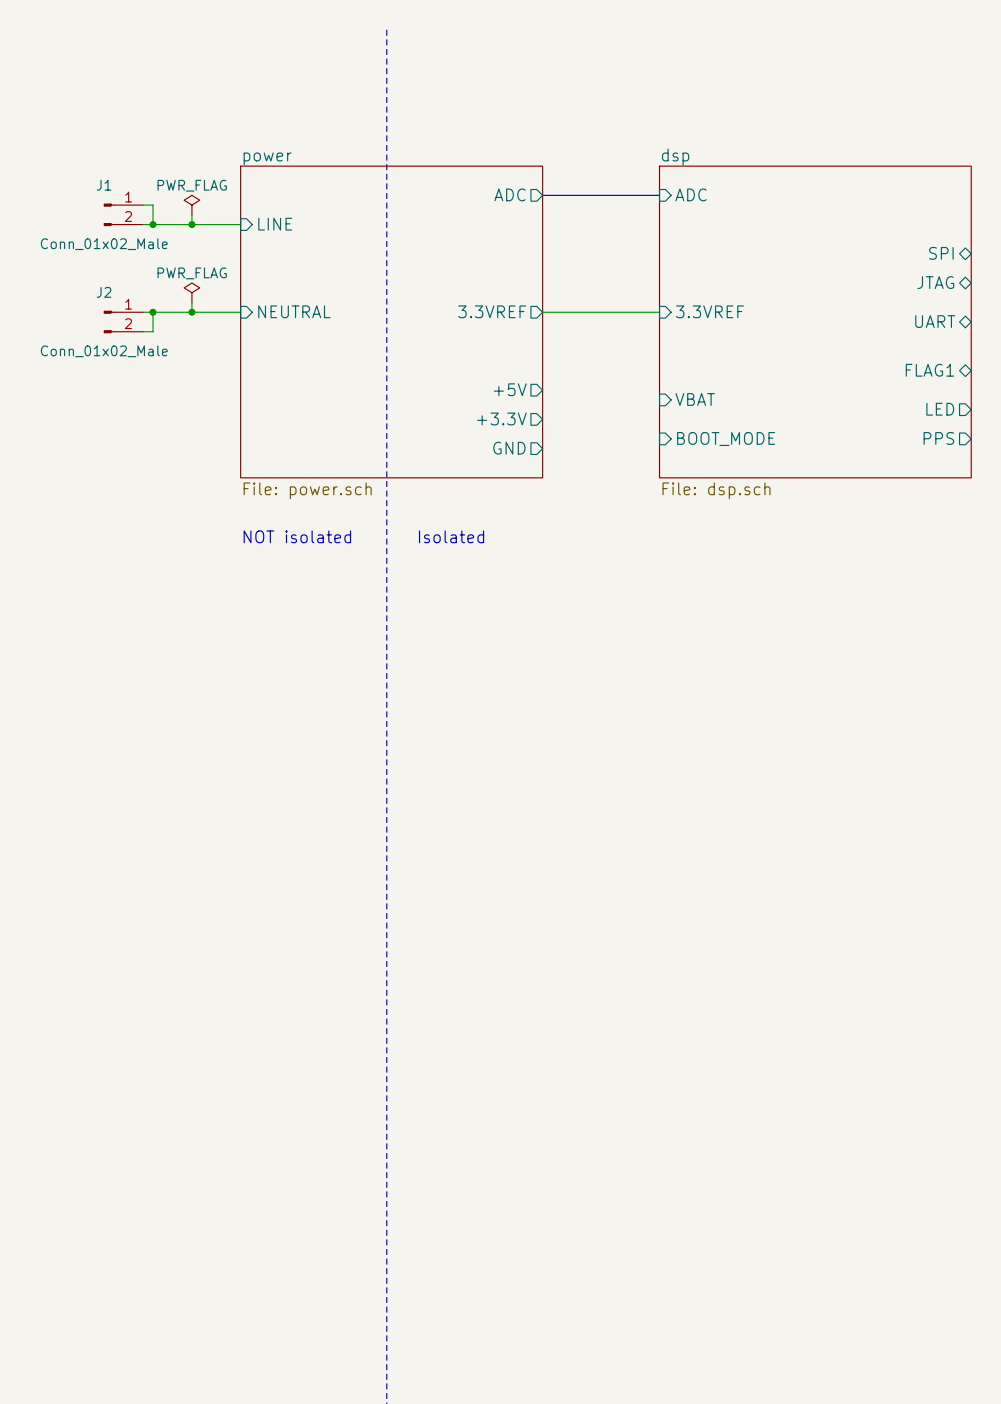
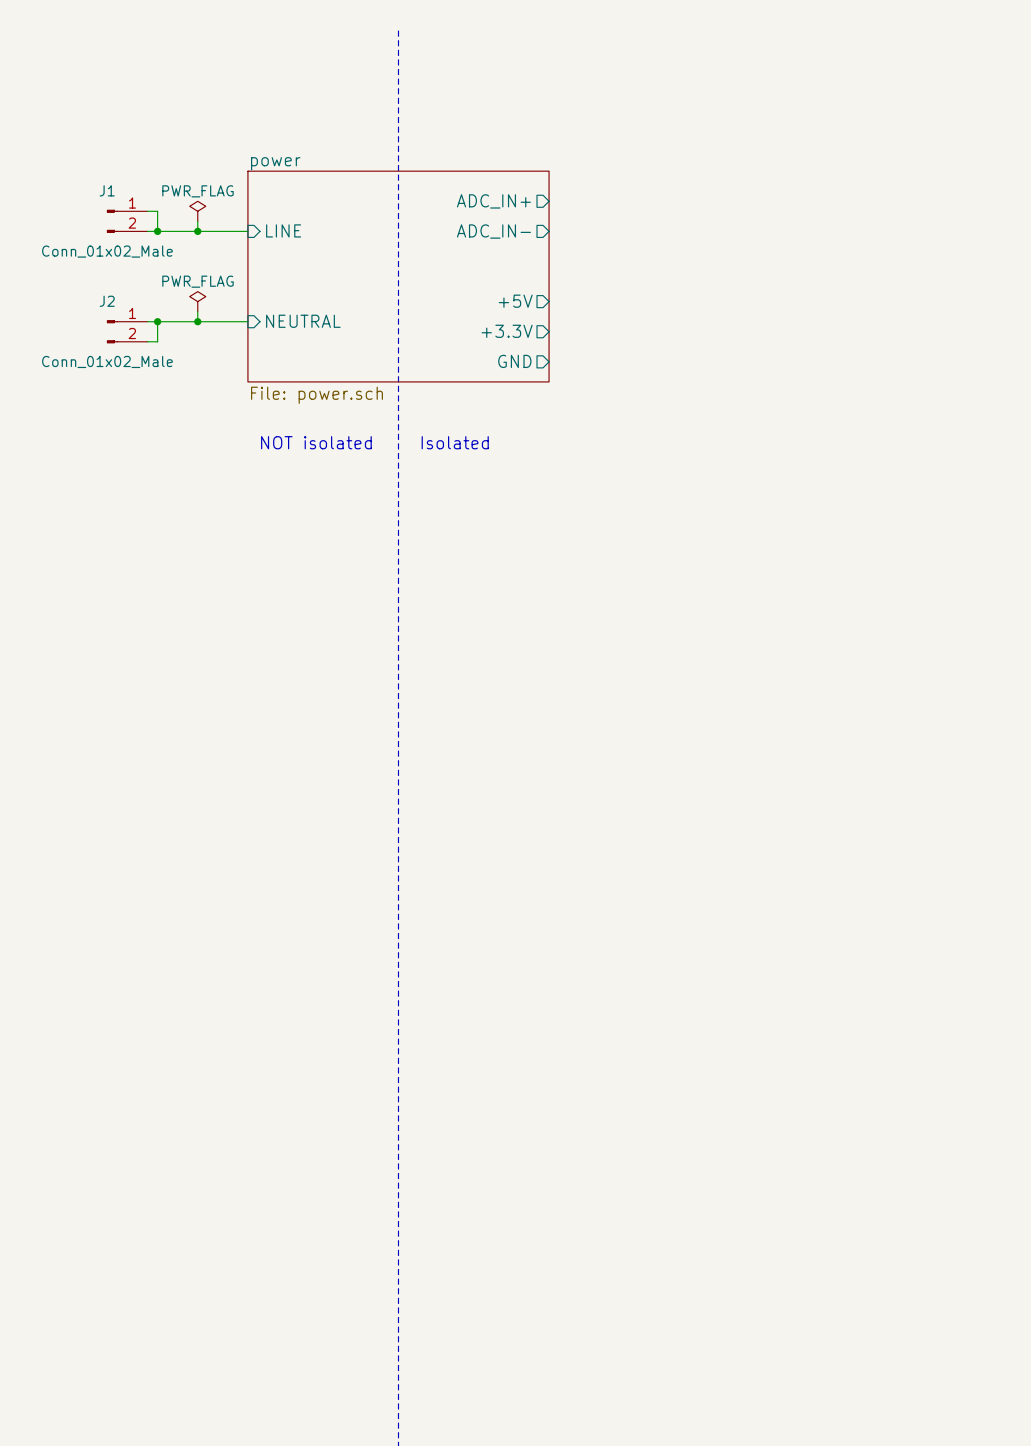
sheet pin: ADC (509, 194) -> none
sheet pin: ADC (691, 194) -> none
sheet pin: none -> ADC_IN+ (493, 201)
bus: (542, 195) (659, 195) -> none
sheet pin: none -> ADC_IN- (493, 231)
sheet pin: SPI (941, 253) -> none
sheet power: none -> File: power.sch (398, 276)
sheet pin: JTAG (935, 282) -> none
sheet pin: 3.3VREF (492, 311) -> none
sheet pin: 3.3VREF (709, 311) -> none
wire: (542, 312) (659, 312) -> none
sheet power: File: power.sch (391, 321) -> none
sheet dsp: File: dsp.sch (815, 321) -> none
sheet pin: UART (935, 321) -> none
sheet pin: FLAG1 (929, 370) -> none
sheet pin position: +5V (510, 389) -> +5V (515, 301)
sheet pin: VBAT (695, 399) -> none
sheet pin: LED (940, 409) -> none
sheet pin position: +3.3V (501, 418) -> +3.3V (507, 331)
sheet pin: PPS (938, 438) -> none
sheet pin: BOOT_MODE (726, 439) -> none
sheet pin position: GND (509, 448) -> GND (514, 361)
text position: NOT isolated (297, 536) -> NOT isolated (316, 442)
text position: Isolated (451, 536) -> Isolated (455, 442)

